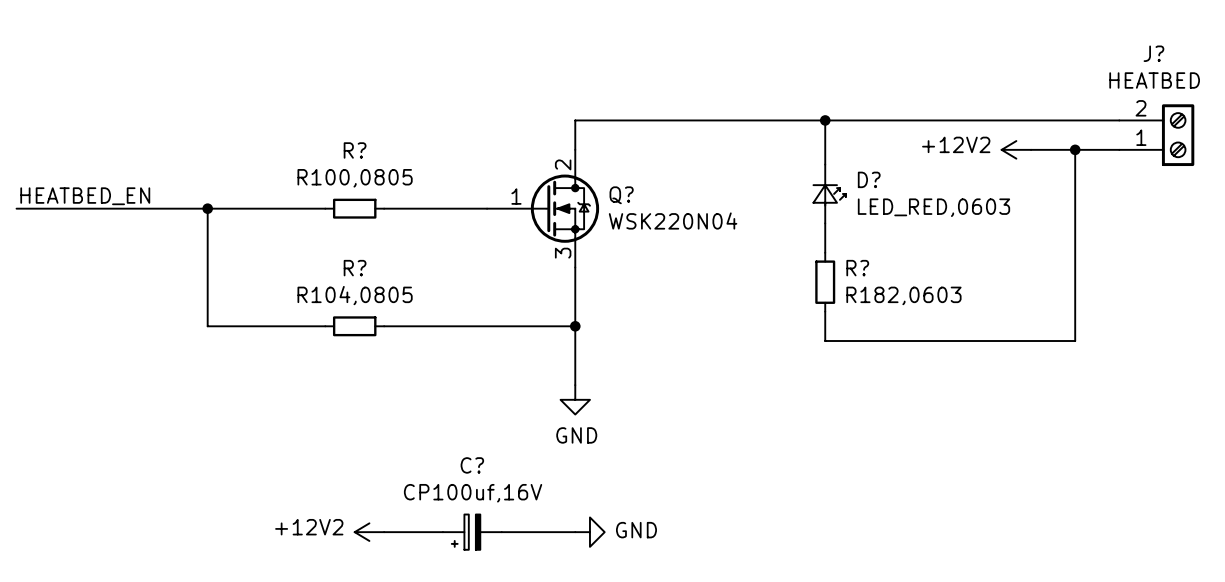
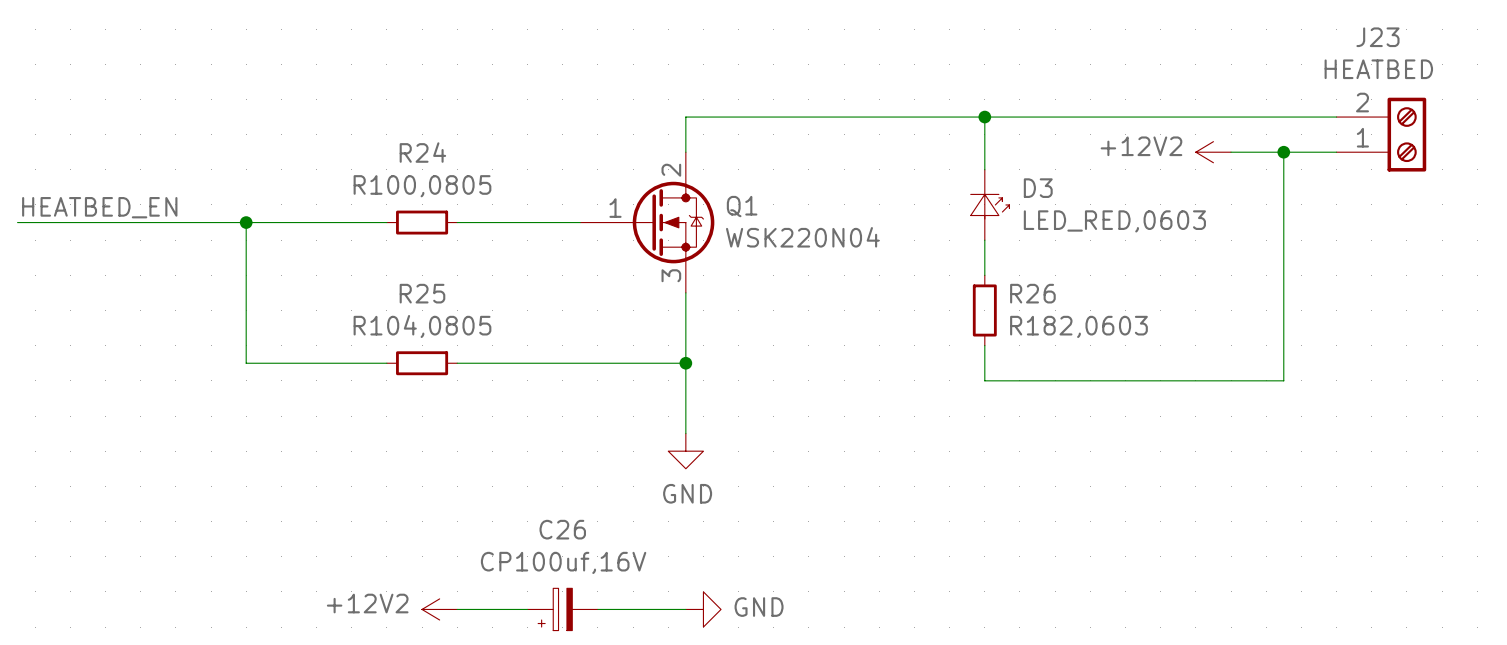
J? name: J? (1153, 53) -> J23 (1377, 37)
R? name: R? (355, 150) -> R24 (422, 152)
D? name: D? (869, 179) -> D3 (1038, 188)
Q? name: Q? (621, 195) -> Q1 (742, 206)
R? name: R? (355, 268) -> R25 (422, 293)
R? name: R? (857, 268) -> R26 (1032, 293)
C? name: C? (472, 465) -> C26 (562, 529)

